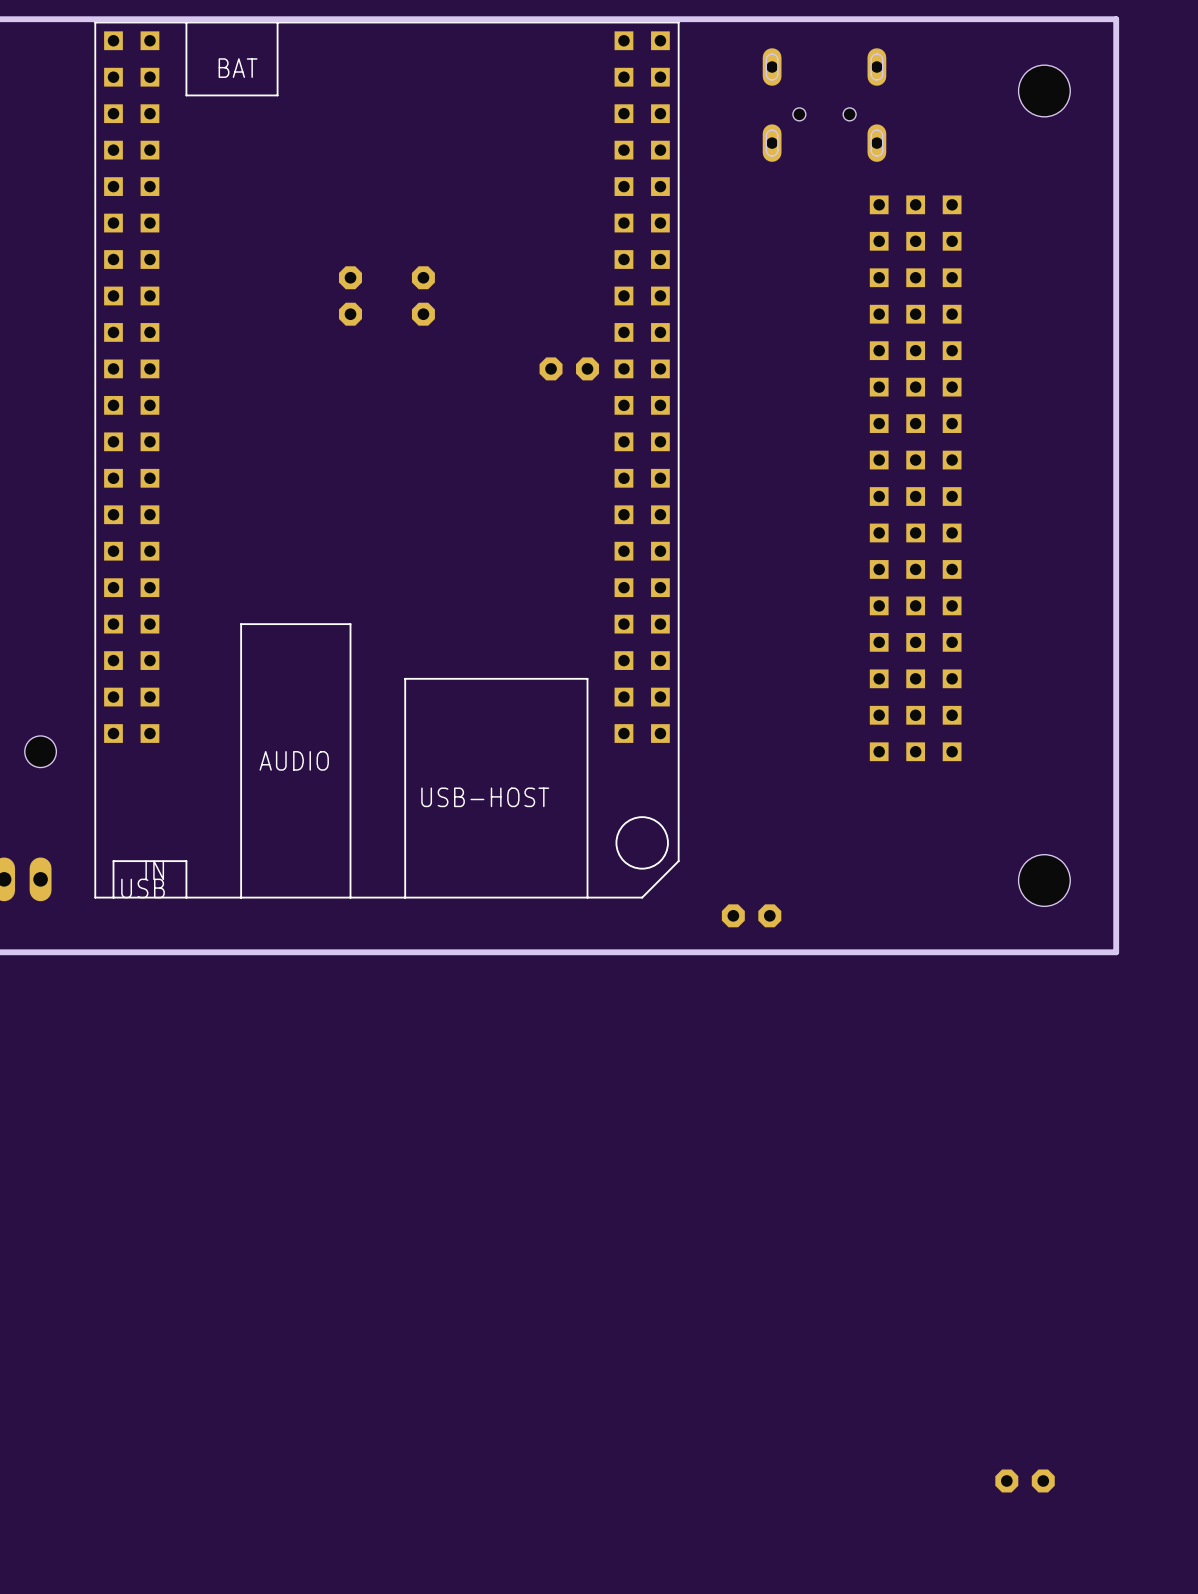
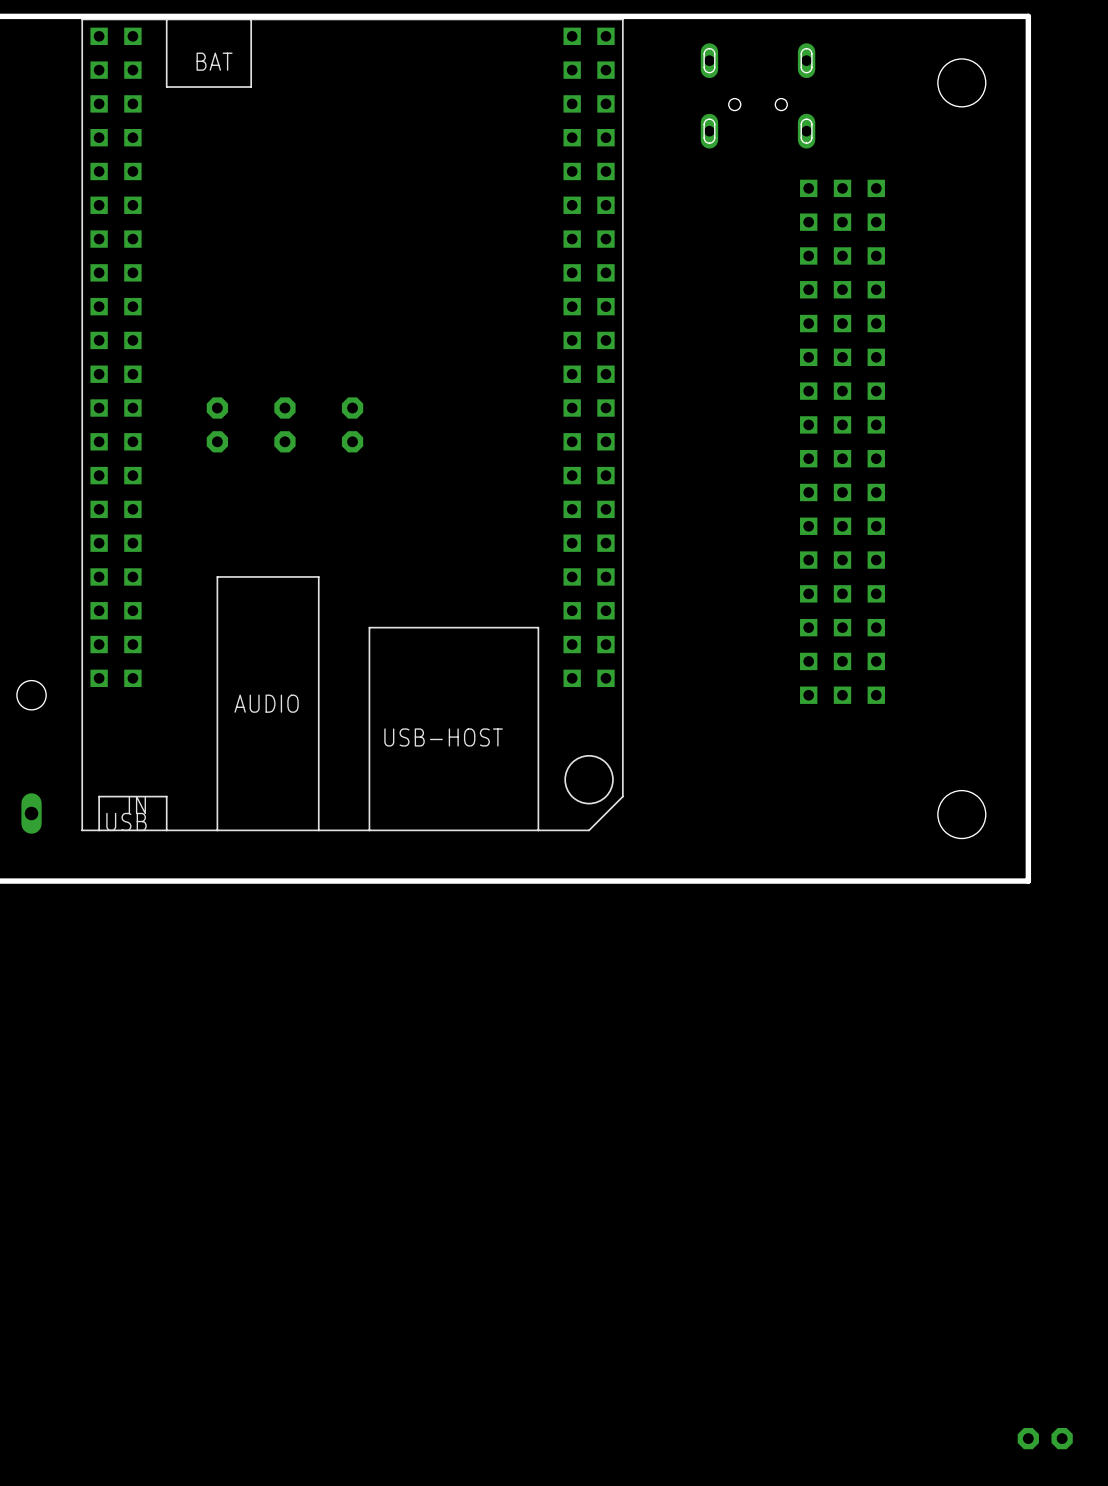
part: (350, 295) -> none
part: (423, 295) -> none
part: (569, 368) -> none
part: none -> (217, 424)
part: none -> (284, 424)
part: none -> (352, 424)
part: (751, 915) -> none
part position: (1025, 1480) -> (1045, 1438)

